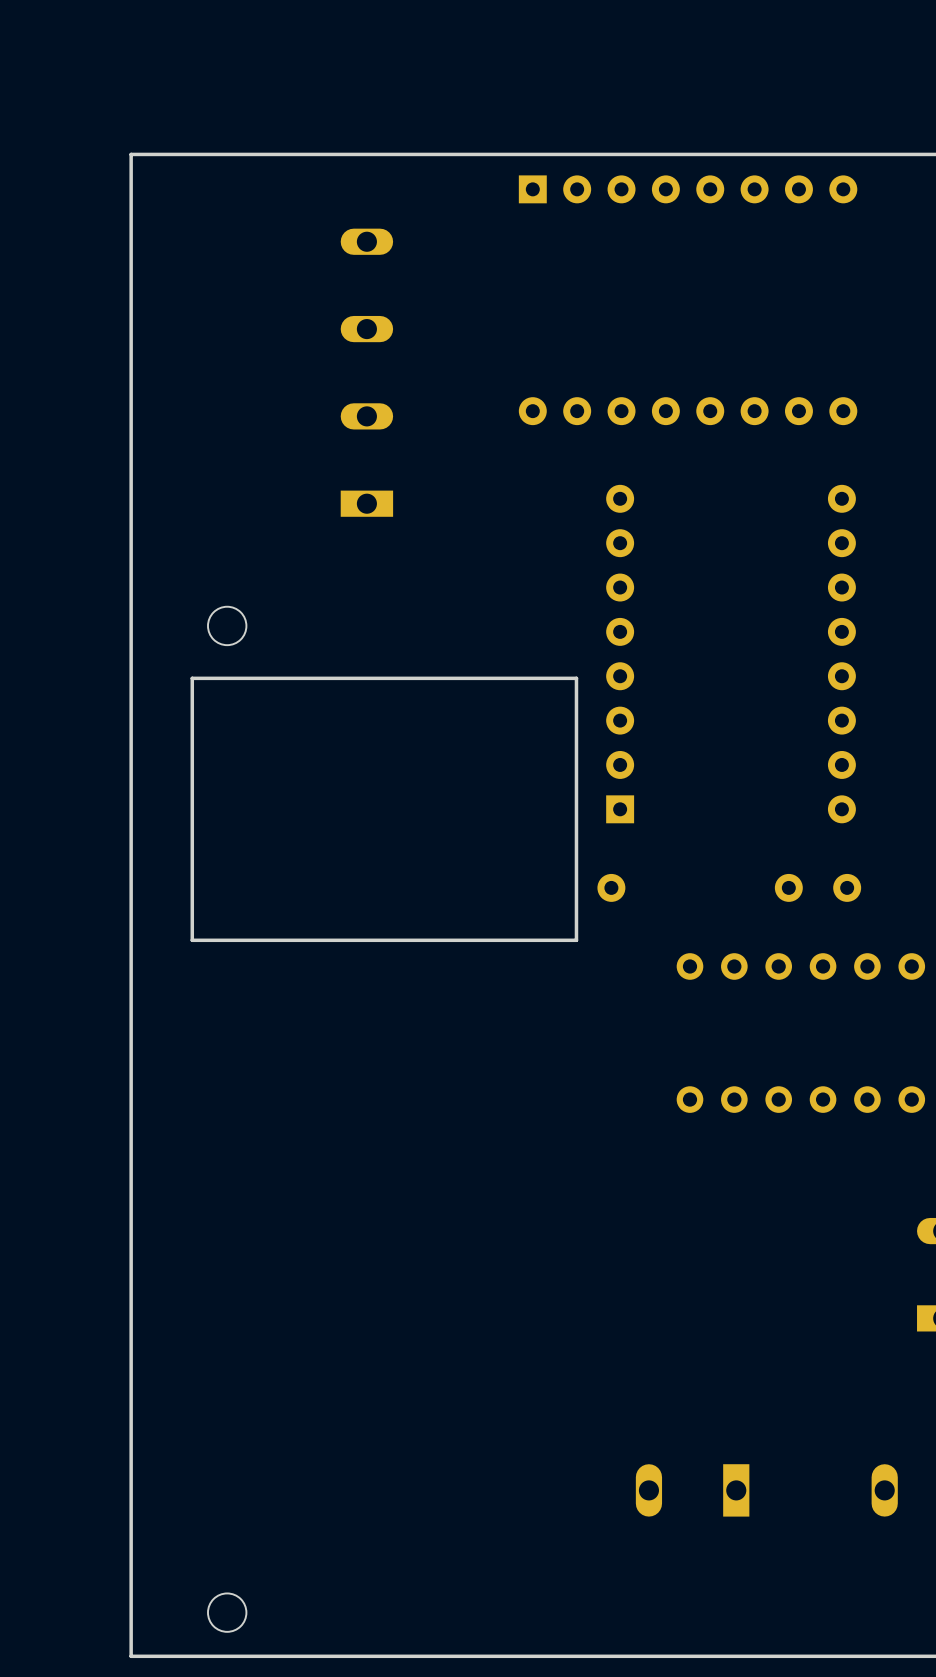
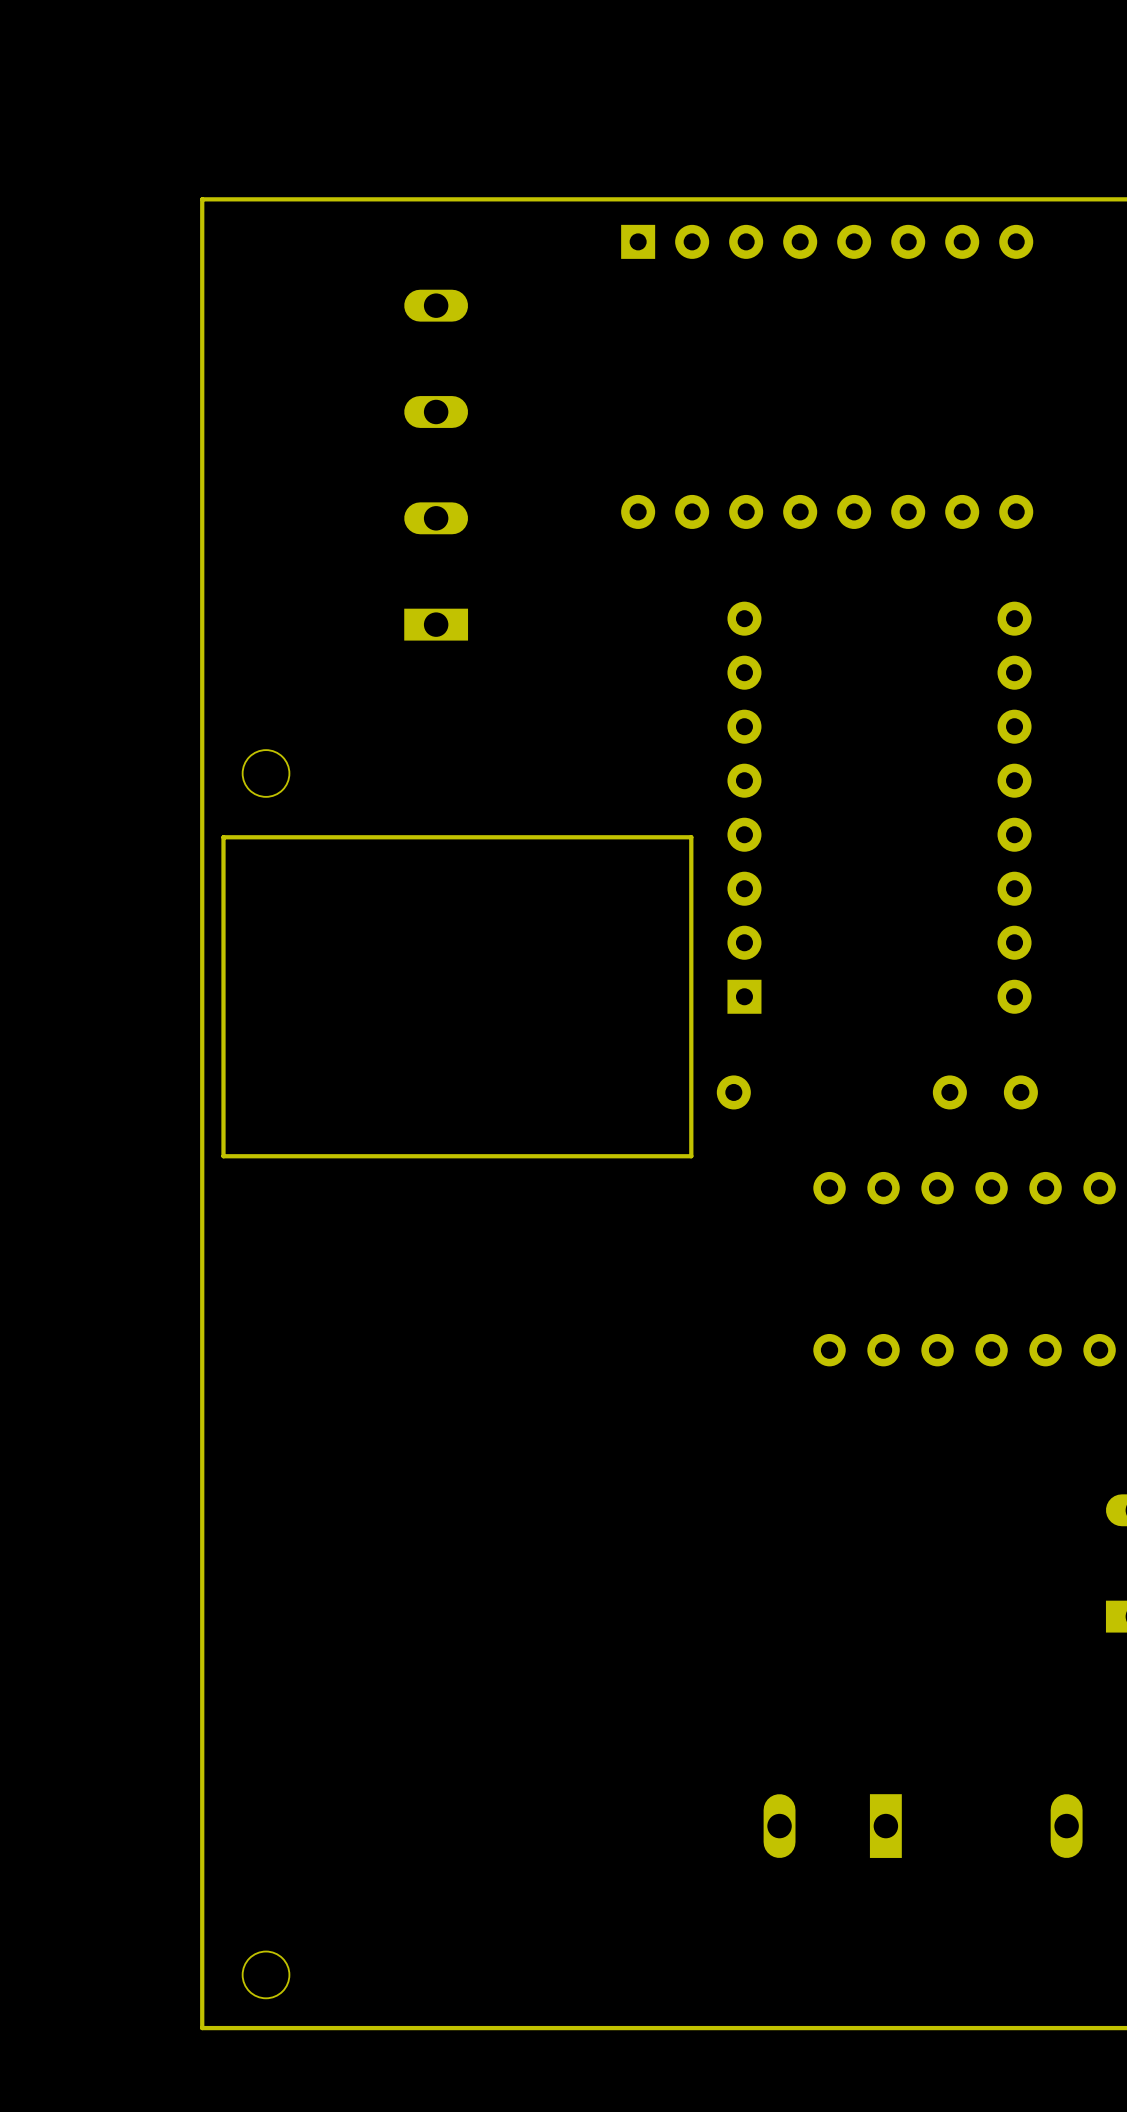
board edge: (174, 154) (131, 154) (131, 1656) (174, 1656) -> (202, 199) (202, 2028)

